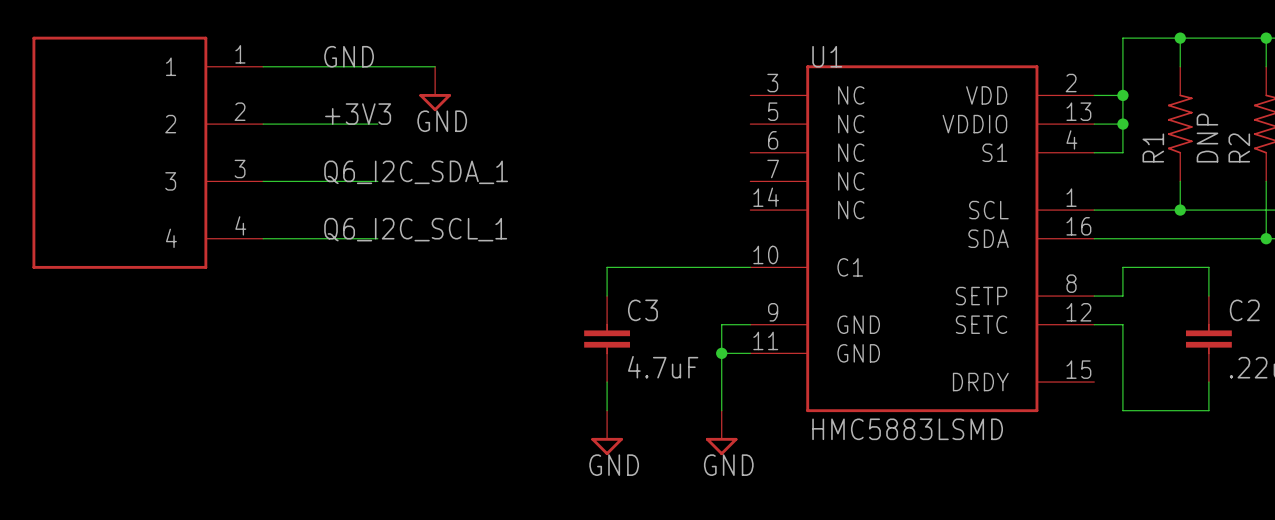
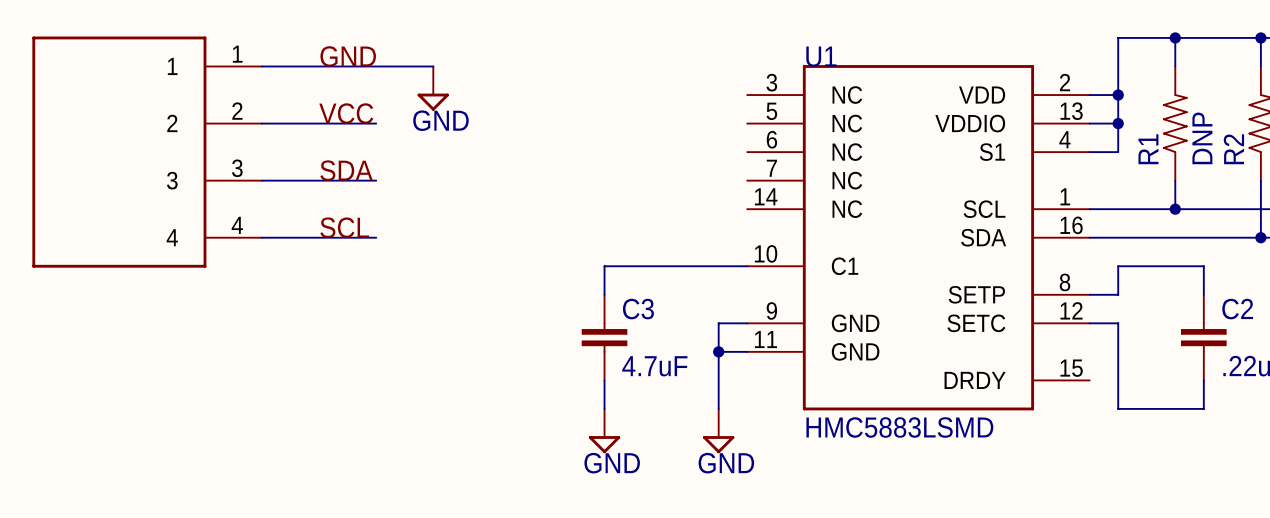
label: +3V3 (358, 114) -> VCC (346, 113)
label: Q6_I2C_SDA_1 (416, 172) -> SDA (346, 170)
label: Q6_I2C_SCL_1 (415, 229) -> SCL (344, 227)

